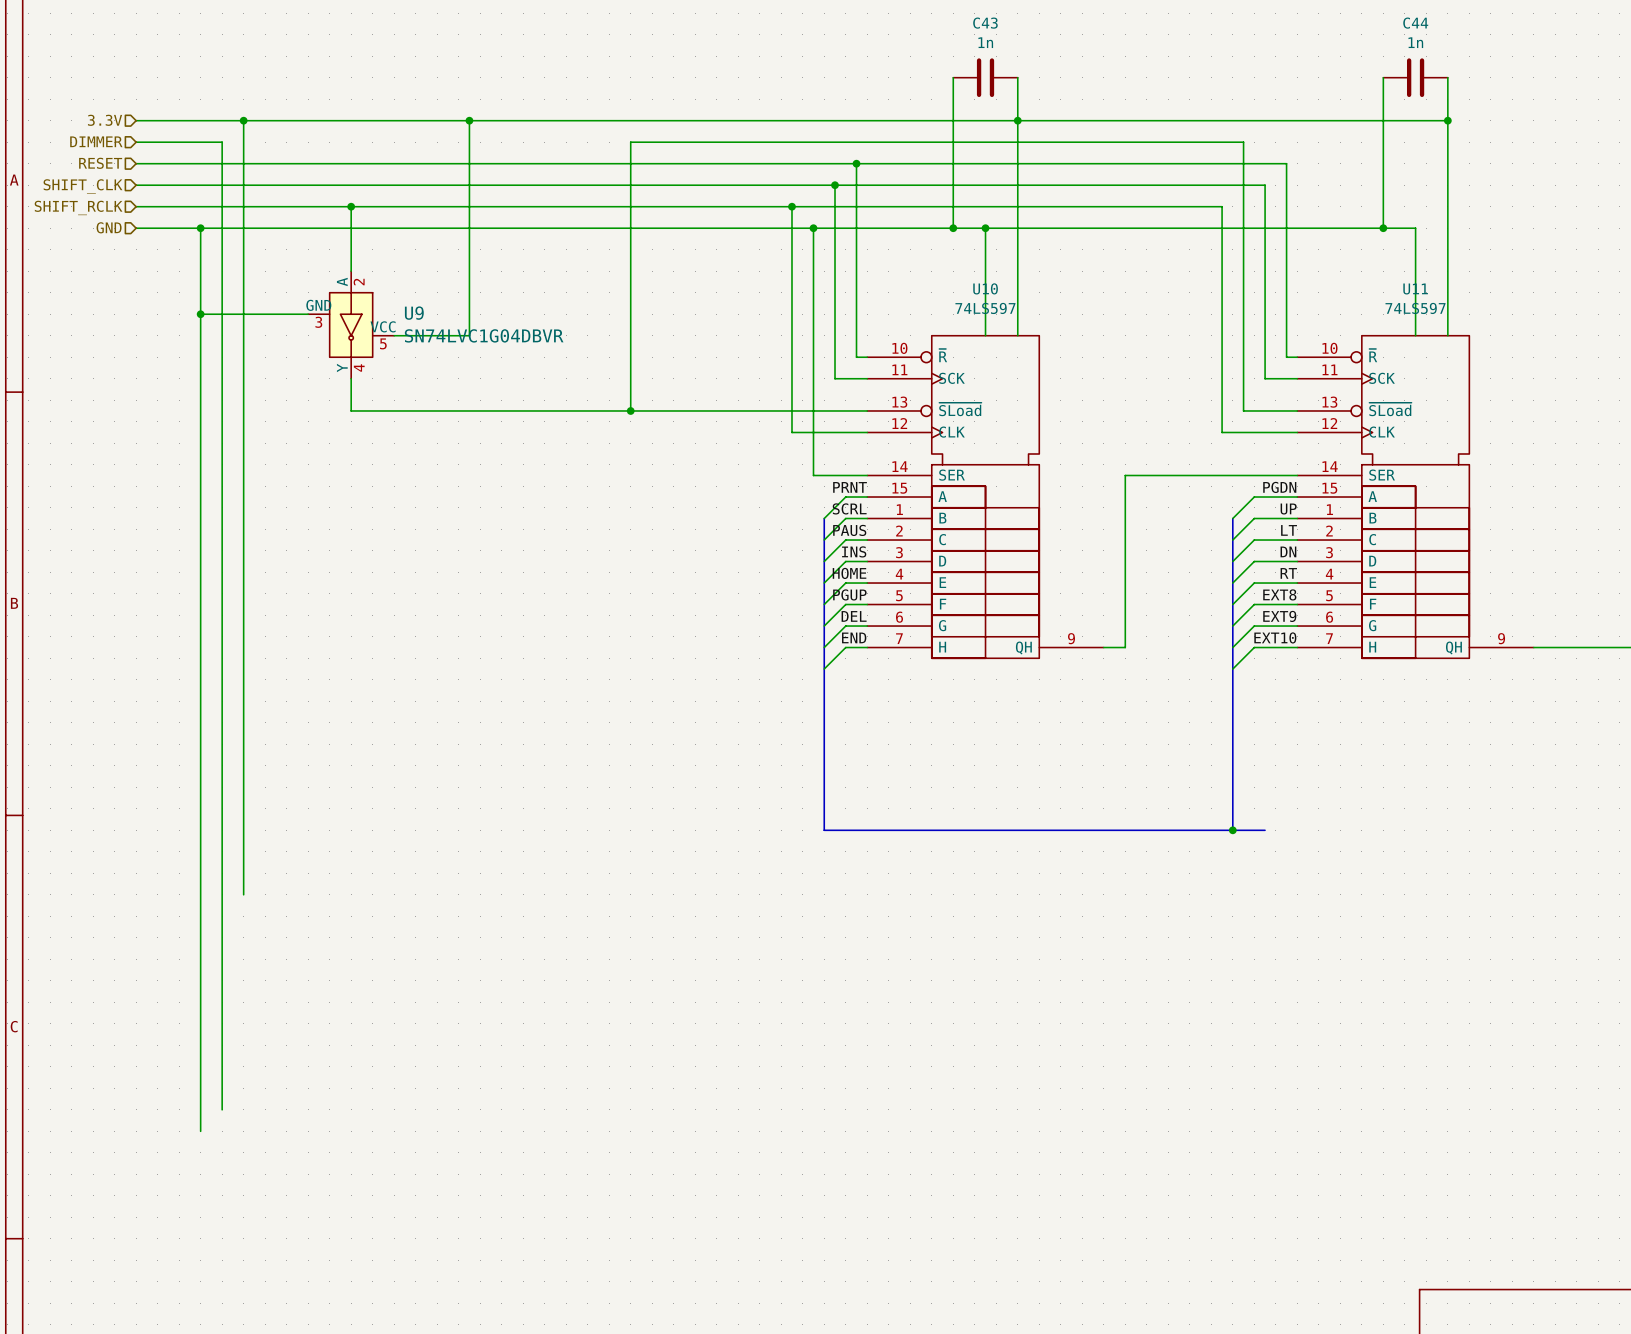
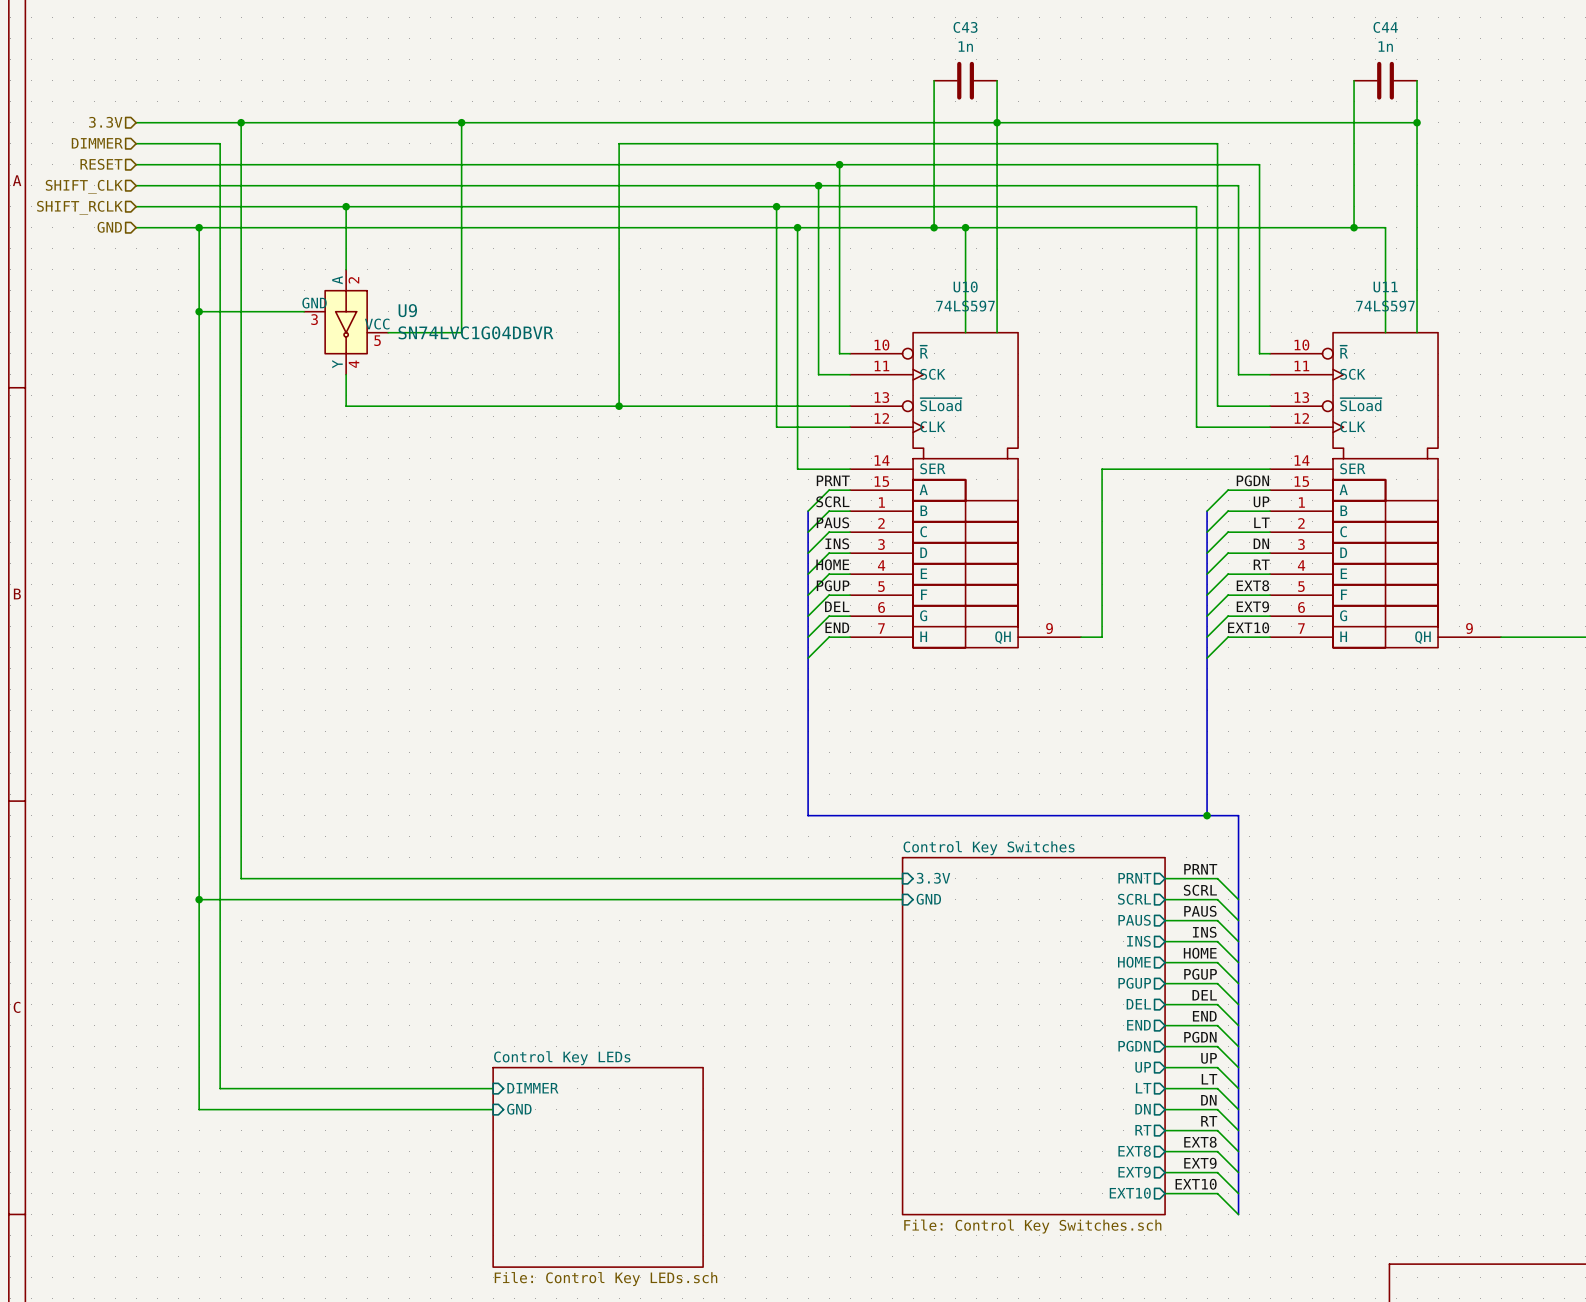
bus: none -> (1238, 815) (1238, 1214)
label: none -> PRNT (1200, 869)
wire: none -> (241, 878) (902, 878)
sheet pin: none -> 3.3V (933, 878)
sheet pin: none -> PRNT (1134, 878)
wire: none -> (1165, 878) (1217, 878) (1238, 899)
label: none -> SCRL (1200, 890)
sheet pin: none -> GND (928, 899)
sheet pin: none -> SCRL (1134, 899)
wire: none -> (199, 899) (902, 899)
junction: none -> (199, 899)
wire: none -> (1165, 899) (1217, 899) (1238, 920)
label: none -> PAUS (1200, 911)
sheet pin: none -> PAUS (1134, 920)
wire: none -> (1165, 920) (1217, 920) (1238, 941)
label: none -> INS (1204, 932)
sheet pin: none -> INS (1138, 941)
wire: none -> (1165, 941) (1217, 941) (1238, 962)
label: none -> HOME (1200, 953)
sheet pin: none -> HOME (1134, 962)
wire: none -> (1165, 962) (1217, 962) (1238, 983)
label: none -> PGUP (1200, 974)
sheet pin: none -> PGUP (1134, 983)
wire: none -> (1165, 983) (1217, 983) (1238, 1004)
label: none -> DEL (1204, 995)
sheet pin: none -> DEL (1138, 1004)
wire: none -> (1165, 1004) (1217, 1004) (1238, 1025)
label: none -> END (1204, 1016)
sheet pin: none -> END (1138, 1025)
wire: none -> (1165, 1025) (1217, 1025) (1238, 1046)
sheet Control Key Switches: none -> File: Control Key Switches.sch (1033, 1036)
label: none -> PGDN (1200, 1037)
sheet pin: none -> PGDN (1134, 1046)
wire: none -> (1165, 1046) (1217, 1046) (1238, 1067)
label: none -> UP (1209, 1058)
sheet pin: none -> UP (1143, 1067)
wire: none -> (1165, 1067) (1217, 1067) (1238, 1088)
label: none -> LT (1209, 1079)
wire: none -> (220, 1088) (493, 1088)
sheet pin: none -> DIMMER (532, 1088)
sheet pin: none -> LT (1143, 1088)
wire: none -> (1165, 1088) (1217, 1088) (1238, 1109)
label: none -> DN (1208, 1100)
sheet pin: none -> GND (519, 1109)
sheet pin: none -> DN (1143, 1109)
wire: none -> (199, 1109) (493, 1109)
wire: none -> (1165, 1109) (1217, 1109) (1238, 1130)
label: none -> RT (1209, 1121)
sheet pin: none -> RT (1143, 1130)
wire: none -> (1165, 1130) (1217, 1130) (1238, 1151)
label: none -> EXT8 (1200, 1142)
sheet pin: none -> EXT8 (1134, 1151)
wire: none -> (1165, 1151) (1217, 1151) (1238, 1172)
label: none -> EXT9 (1200, 1163)
sheet Control Key LEDs: none -> File: Control Key LEDs.sch (598, 1167)
sheet pin: none -> EXT9 (1134, 1172)
wire: none -> (1165, 1172) (1217, 1172) (1238, 1193)
label: none -> EXT10 (1196, 1184)
sheet pin: none -> EXT10 (1130, 1193)
wire: none -> (1165, 1193) (1217, 1193) (1238, 1214)

